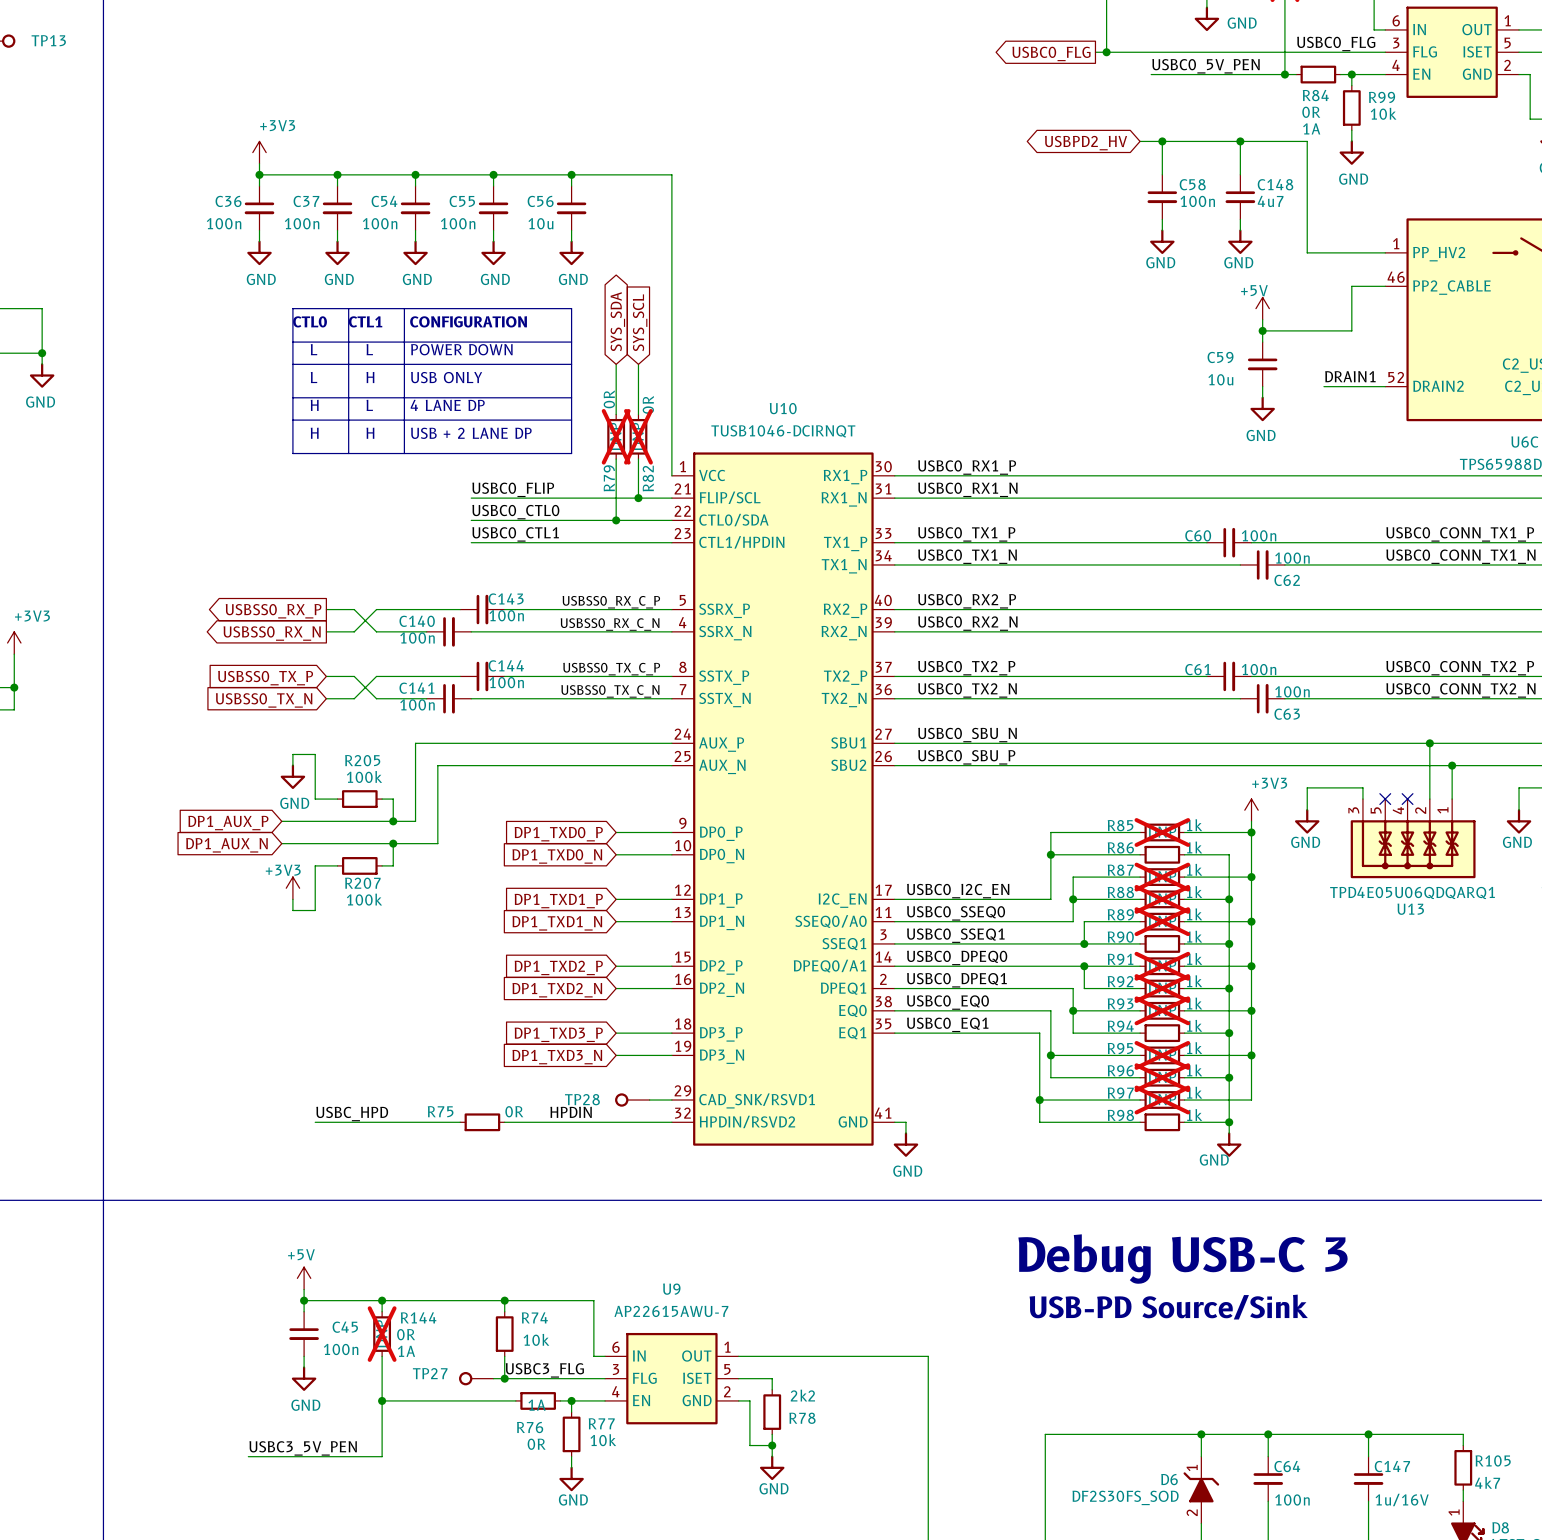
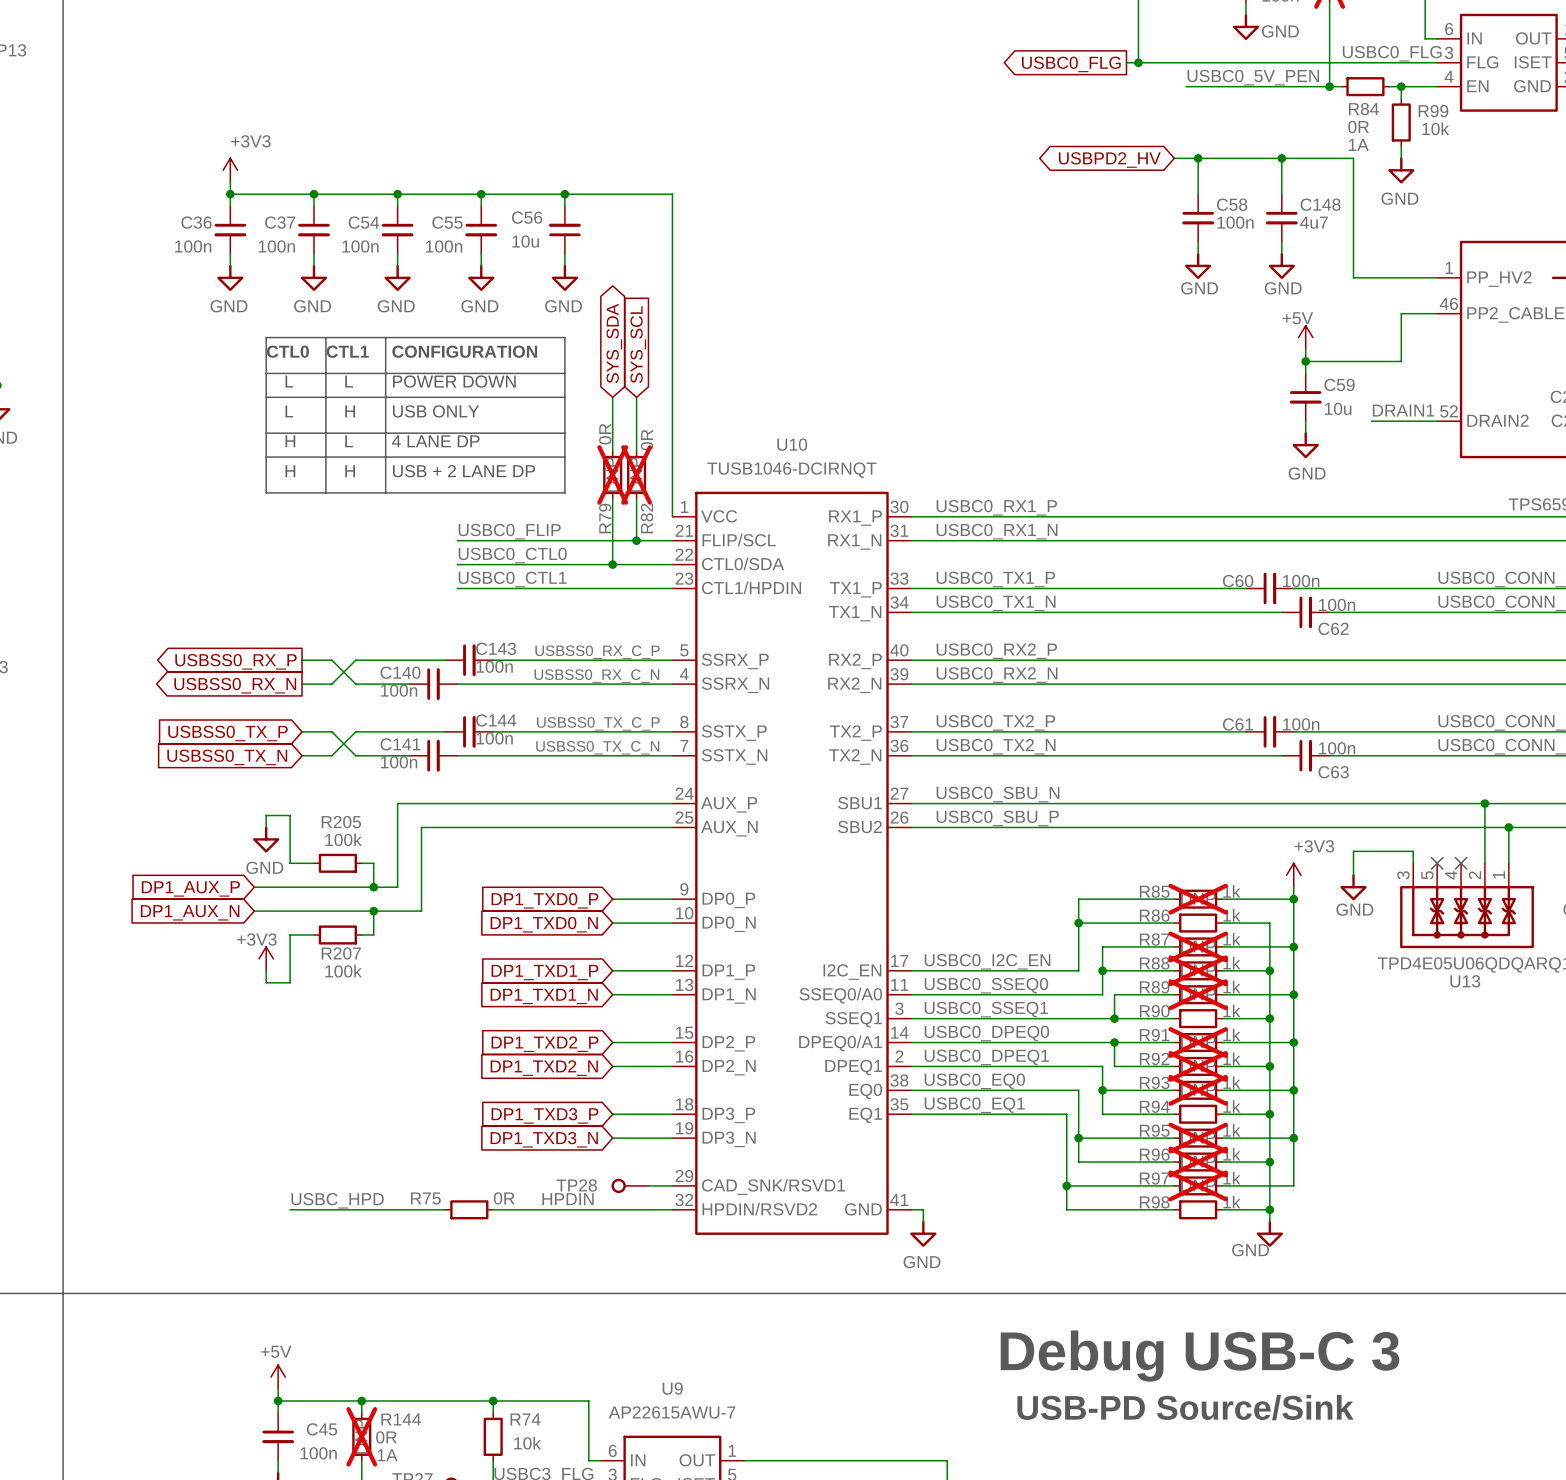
C56 rotation: 0° (571, 208) -> 180° (564, 229)
C59 name position: C59 (1220, 357) -> C59 (1339, 384)
C59 text position: 10u (1220, 379) -> 10u (1338, 408)

